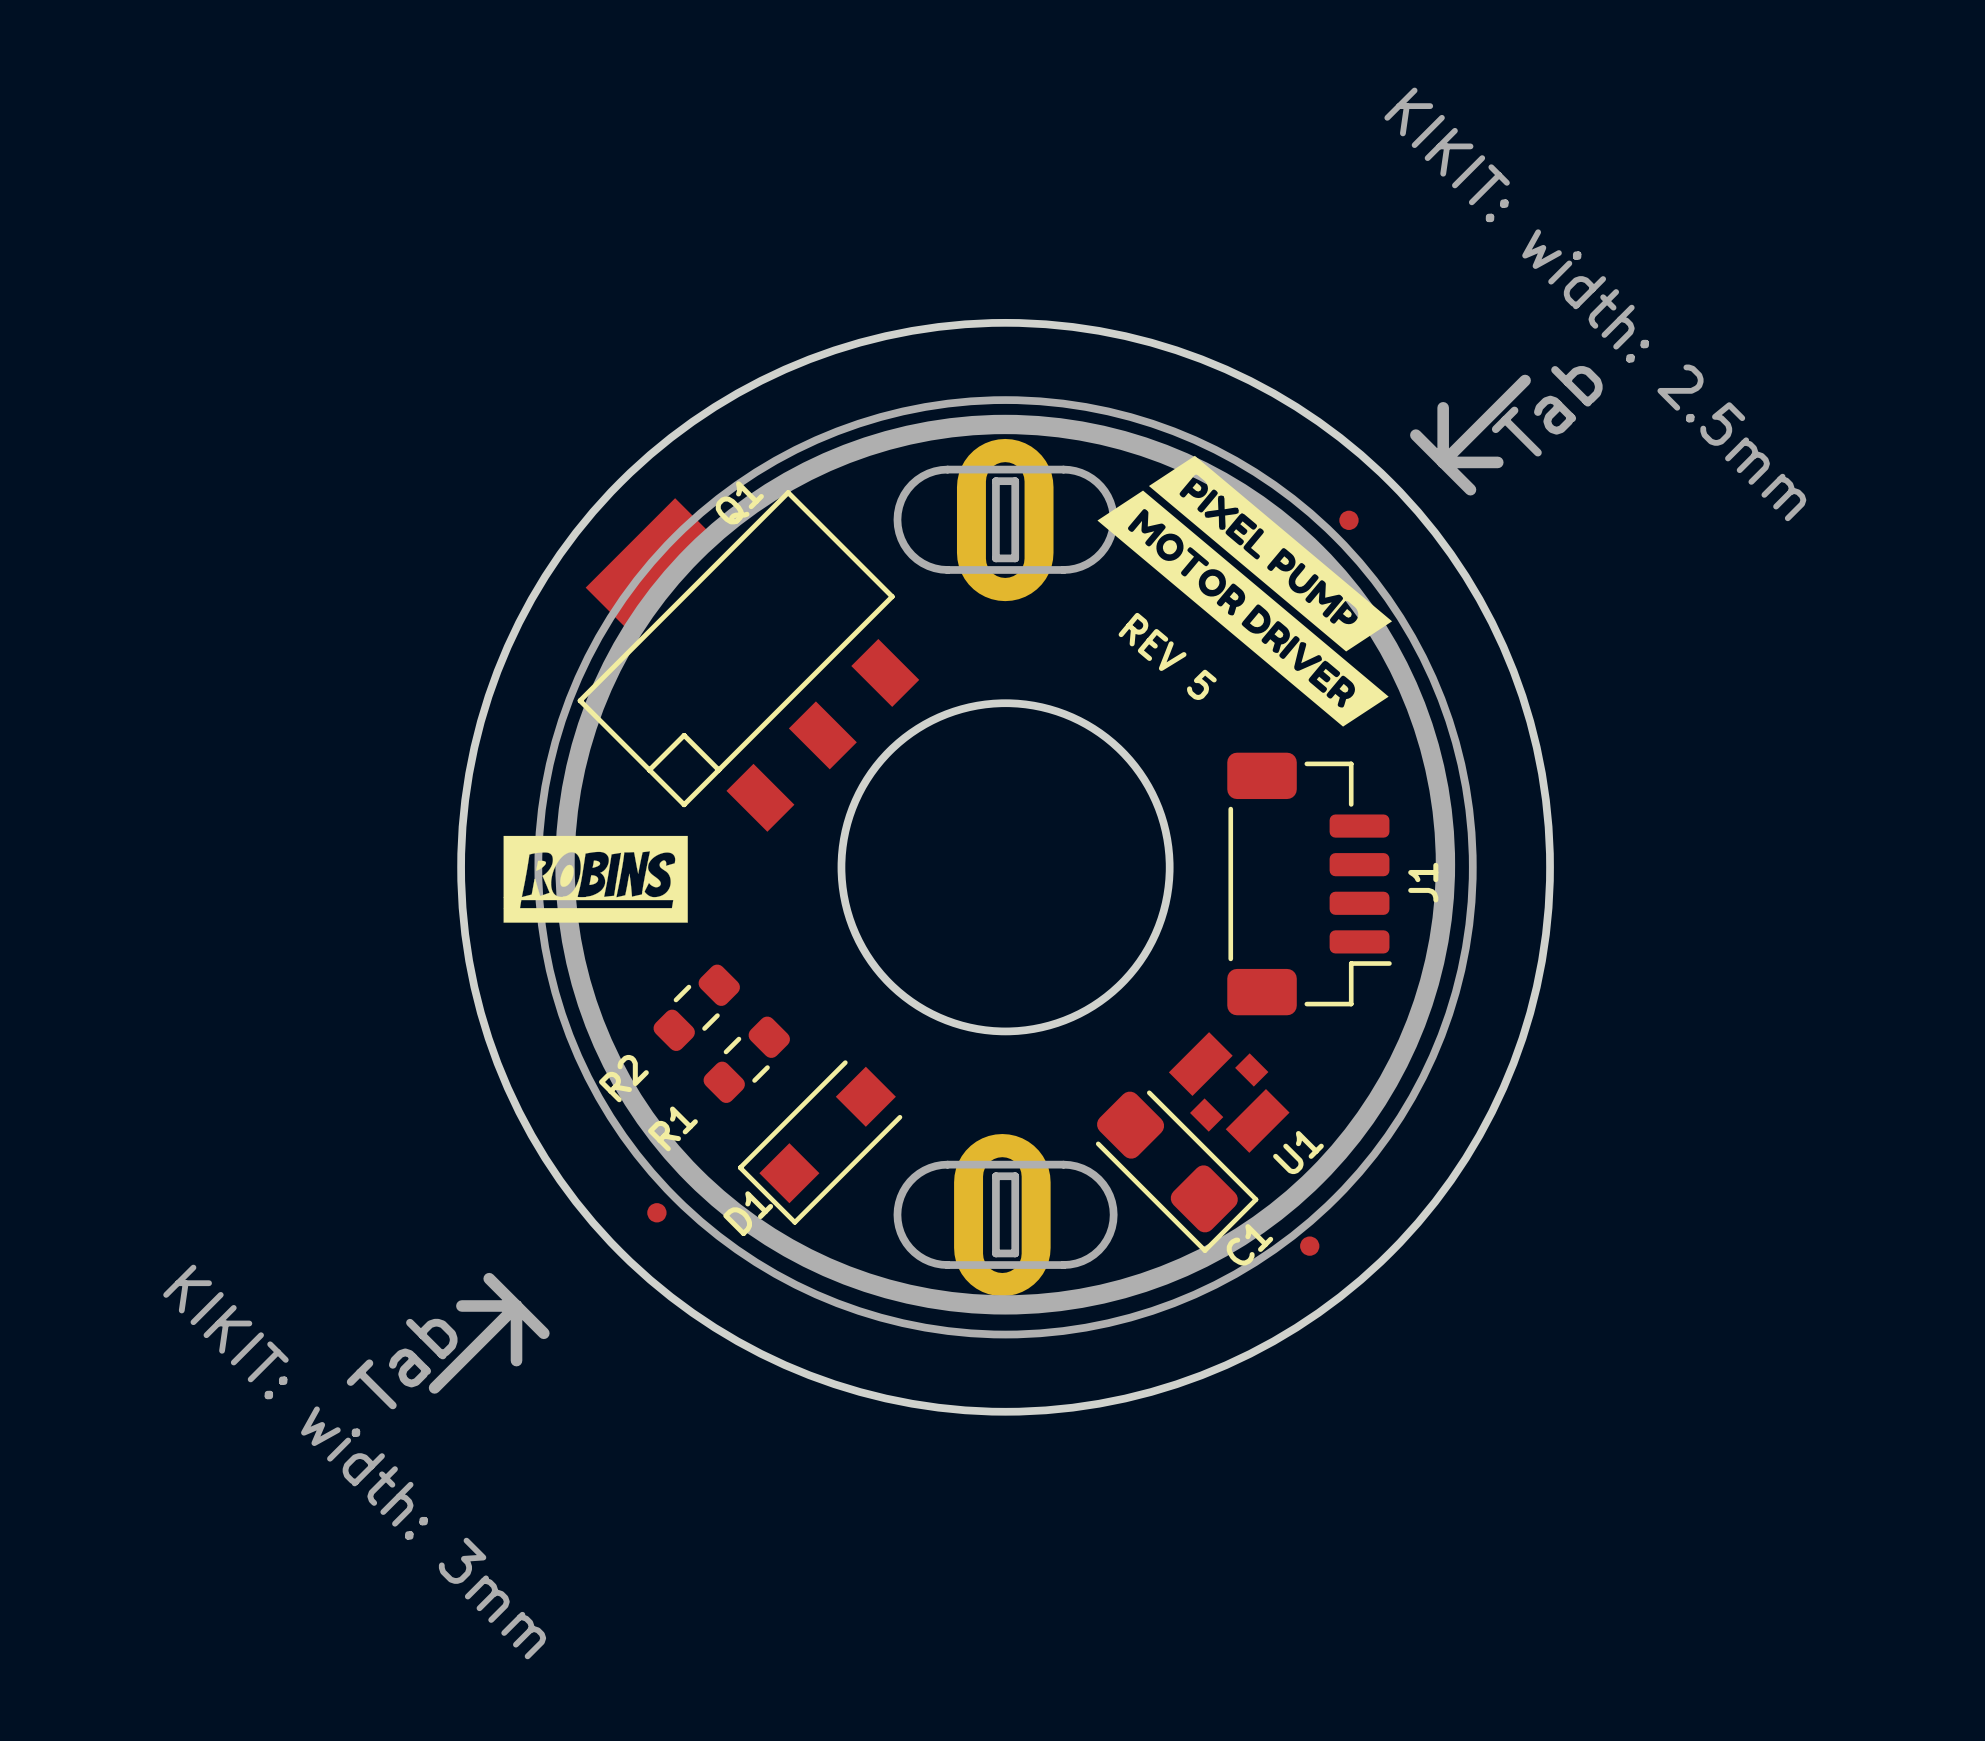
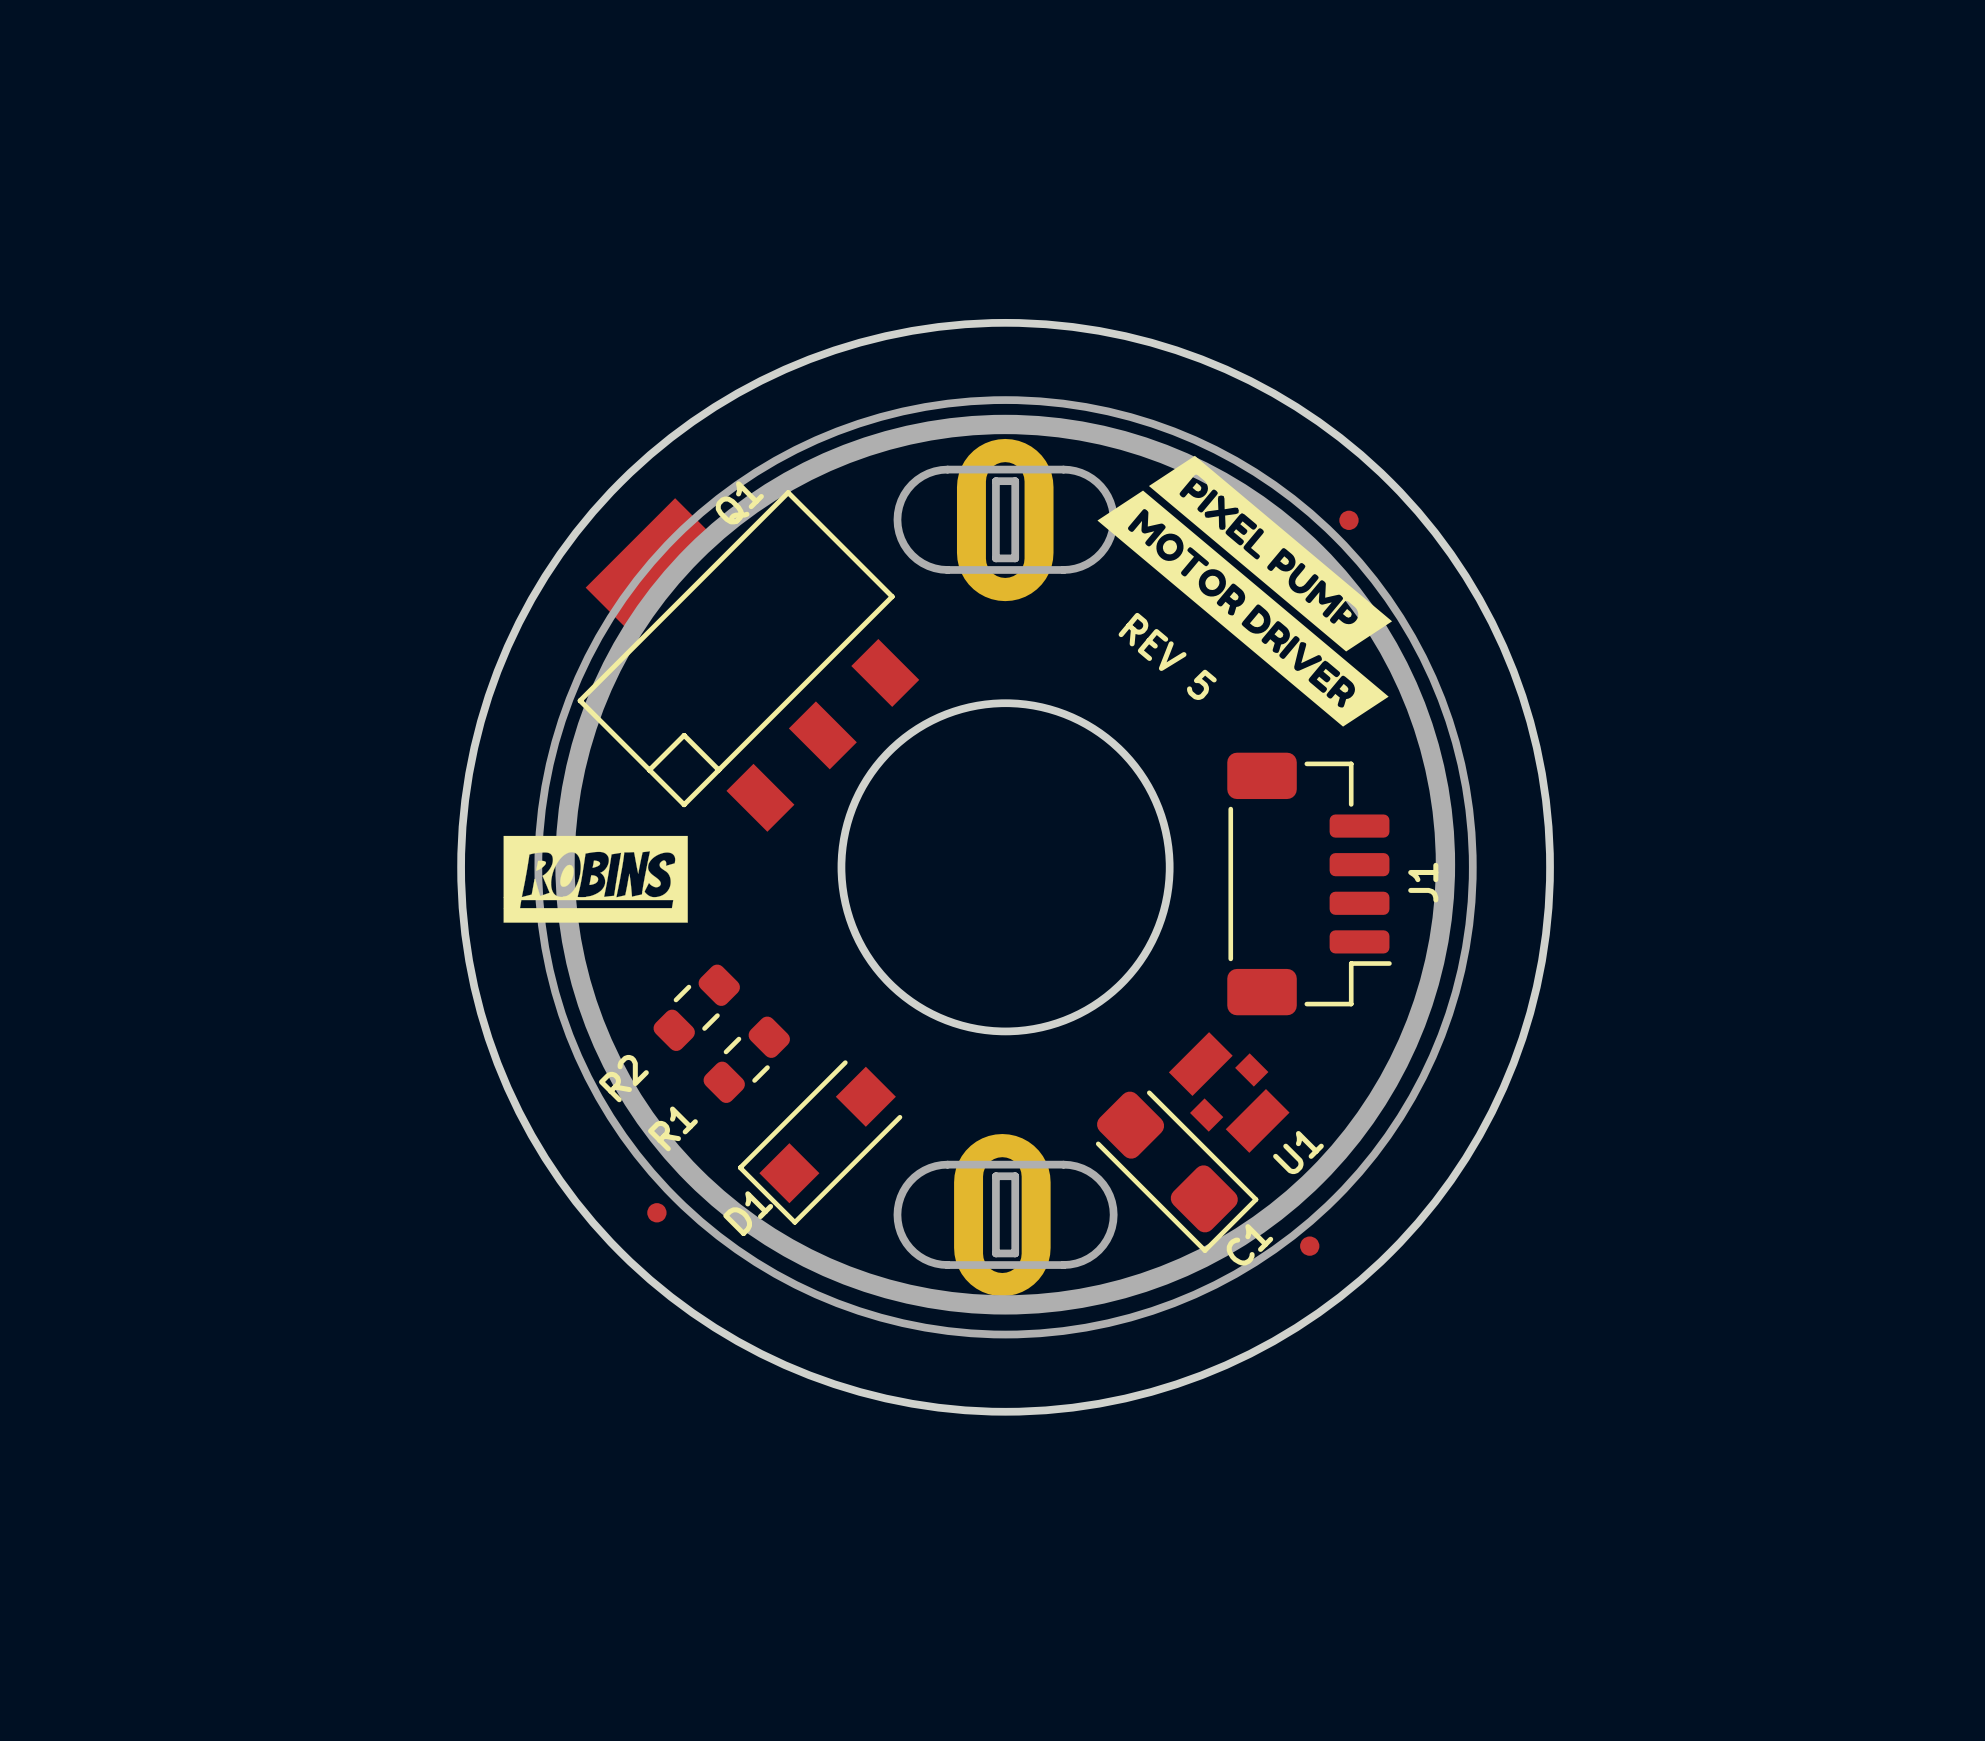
drawing: [1410, 374, 1531, 496] -> none
drawing: [428, 1272, 550, 1394] -> none

